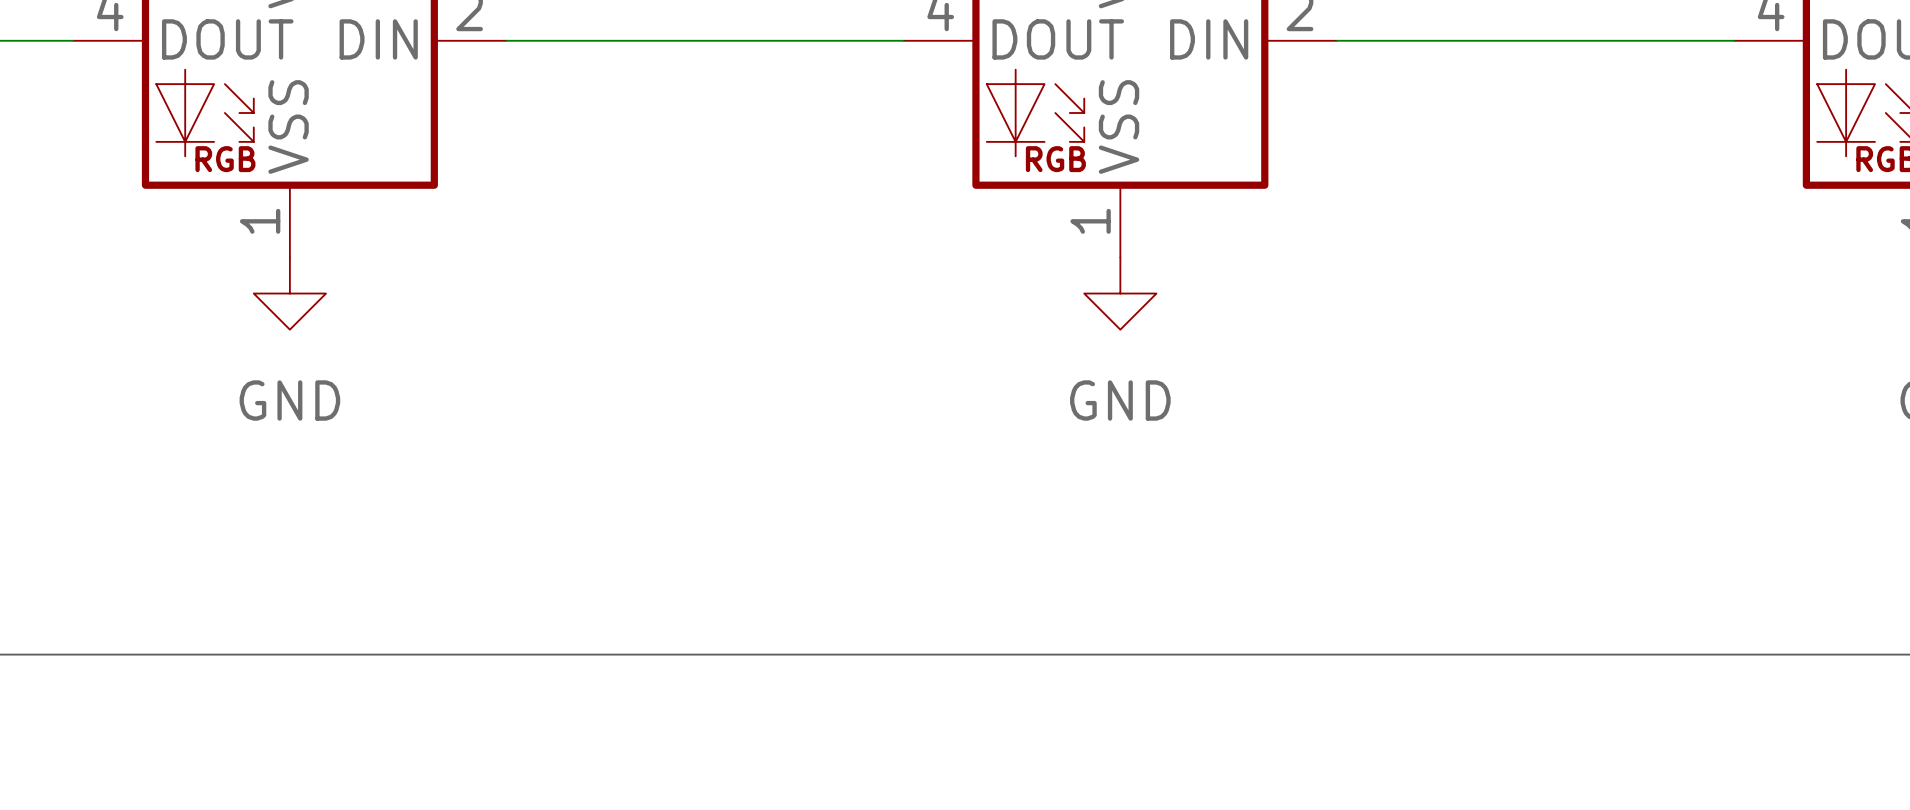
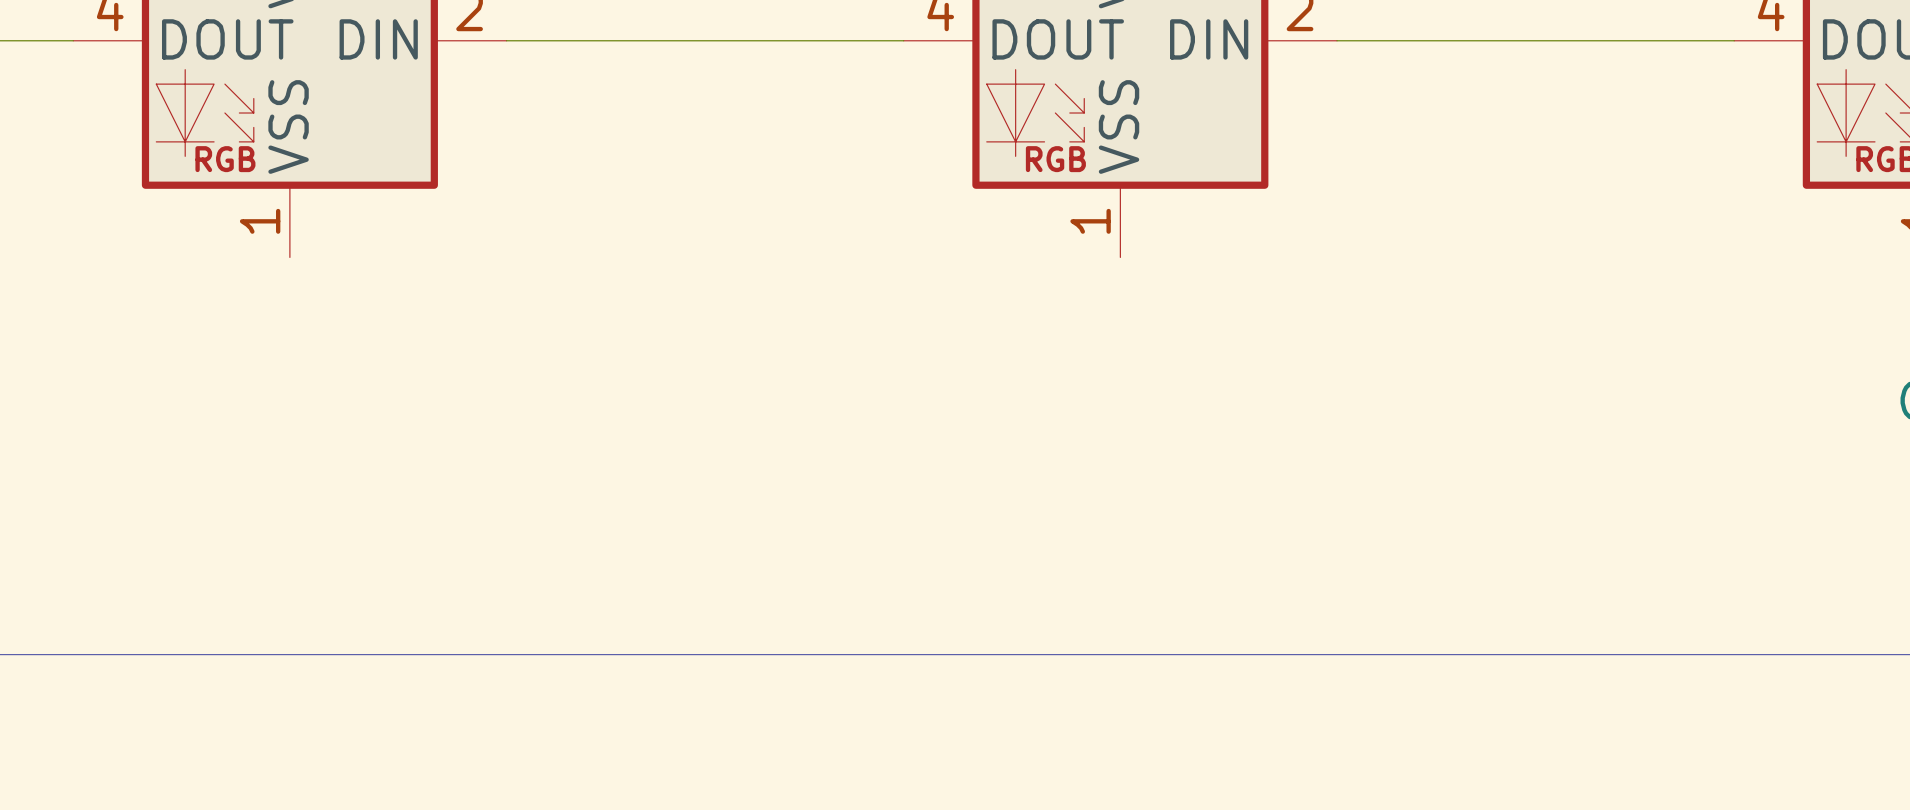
power symbol: GND (289, 293) -> none
power symbol: GND (1120, 293) -> none

